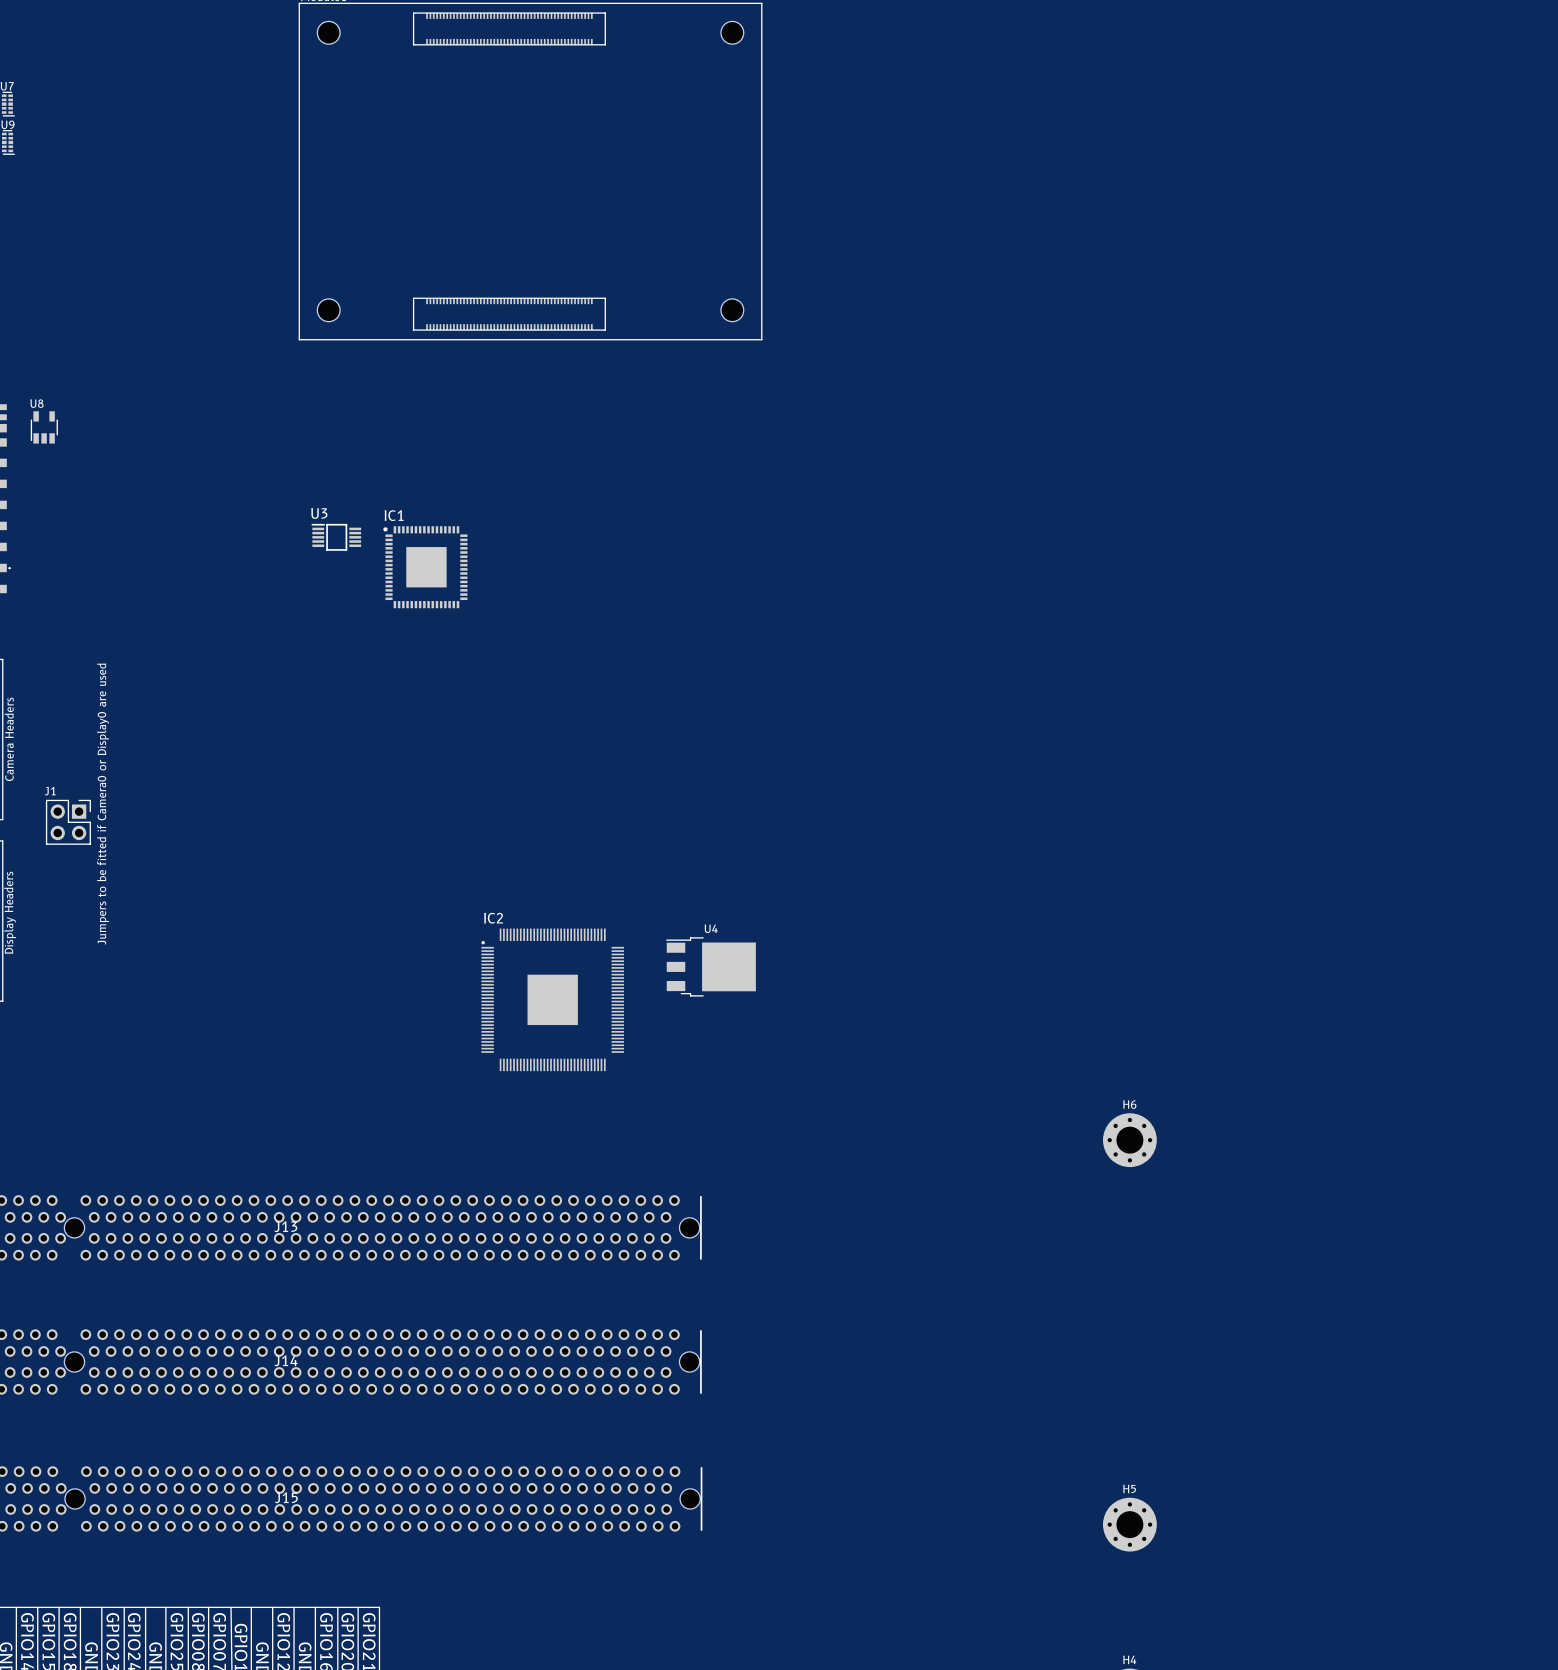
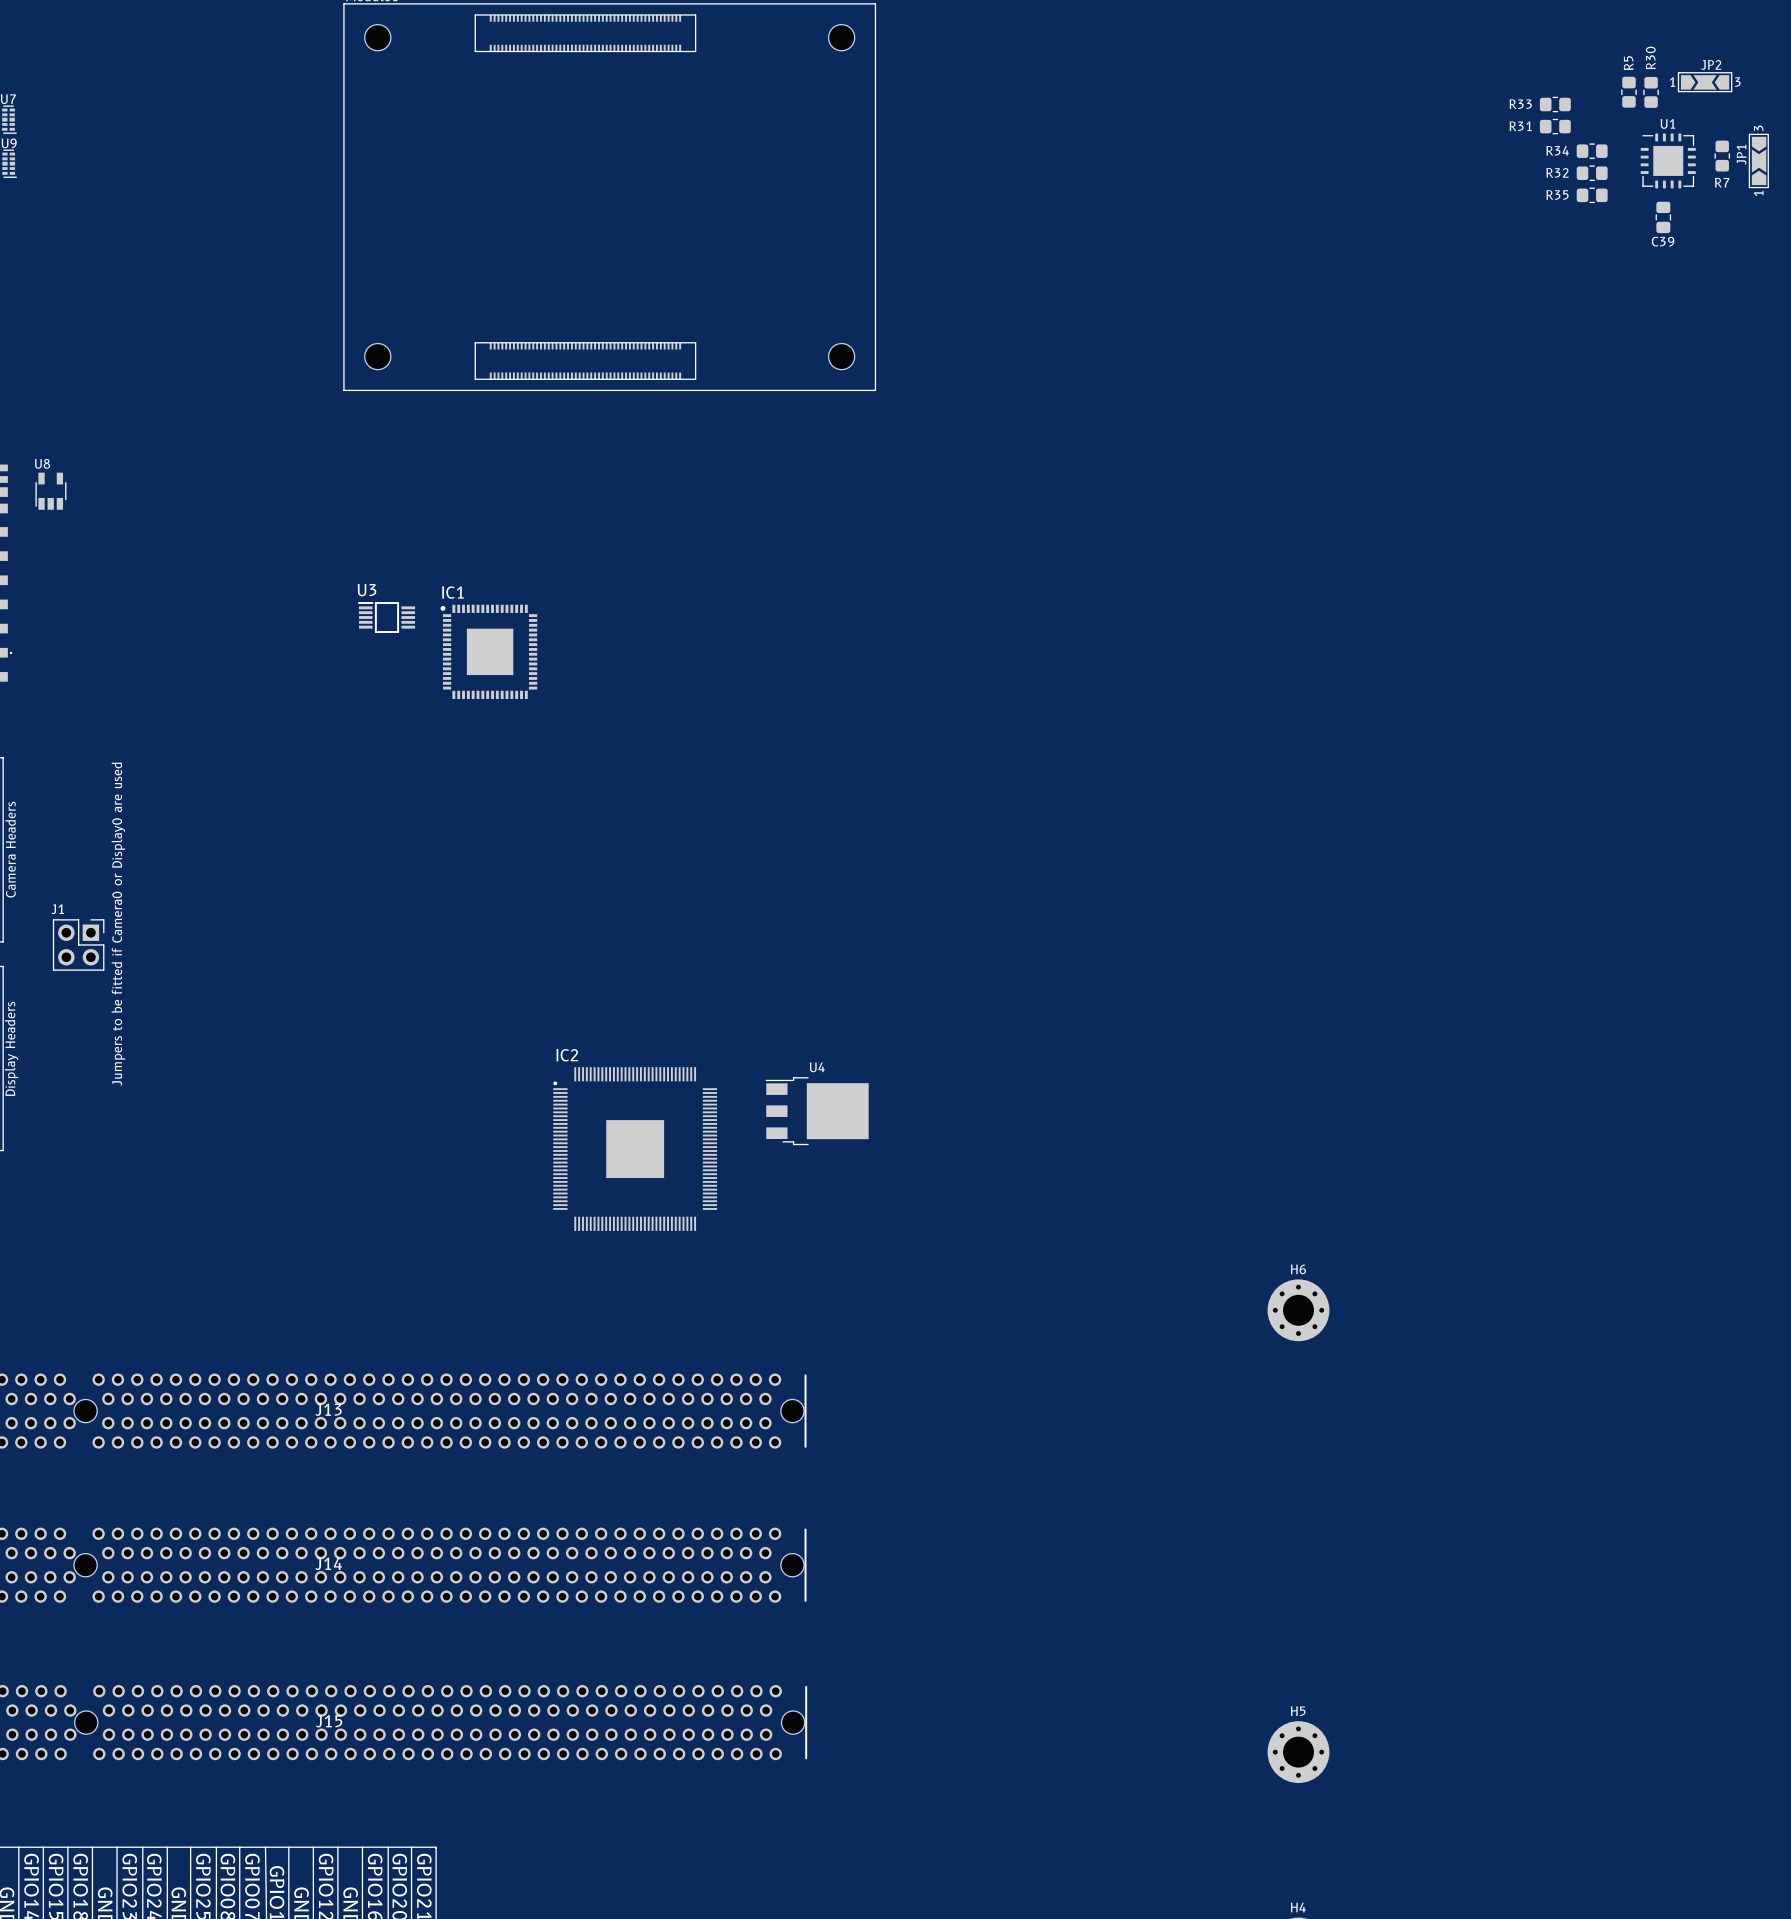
JP2: none -> (1705, 82)
R5: none -> (1628, 92)
R30: none -> (1651, 92)
R33: none -> (1555, 104)
R31: none -> (1555, 126)
R34: none -> (1592, 151)
R7: none -> (1722, 156)
U1: none -> (1668, 160)
JP1: none -> (1758, 160)
R32: none -> (1592, 173)
R35: none -> (1592, 195)
C39: none -> (1663, 217)

